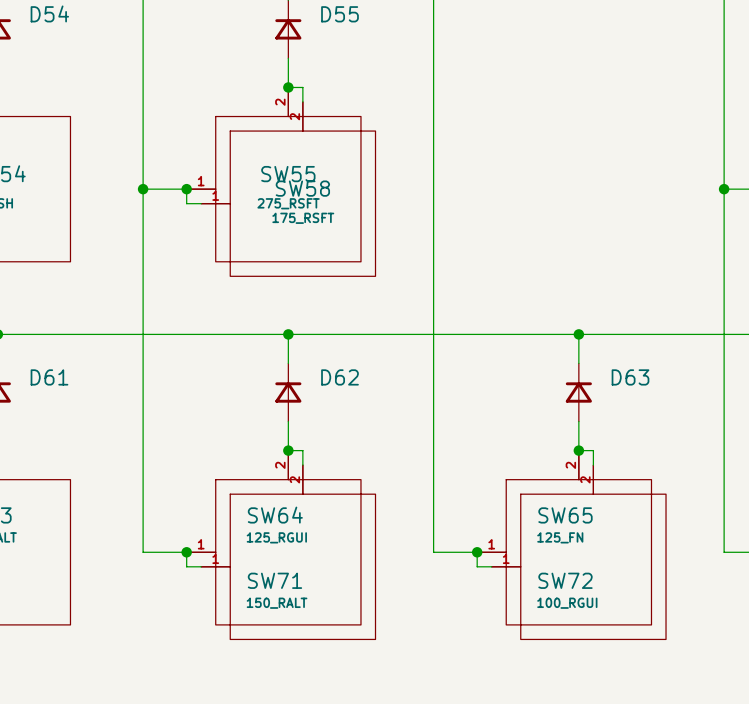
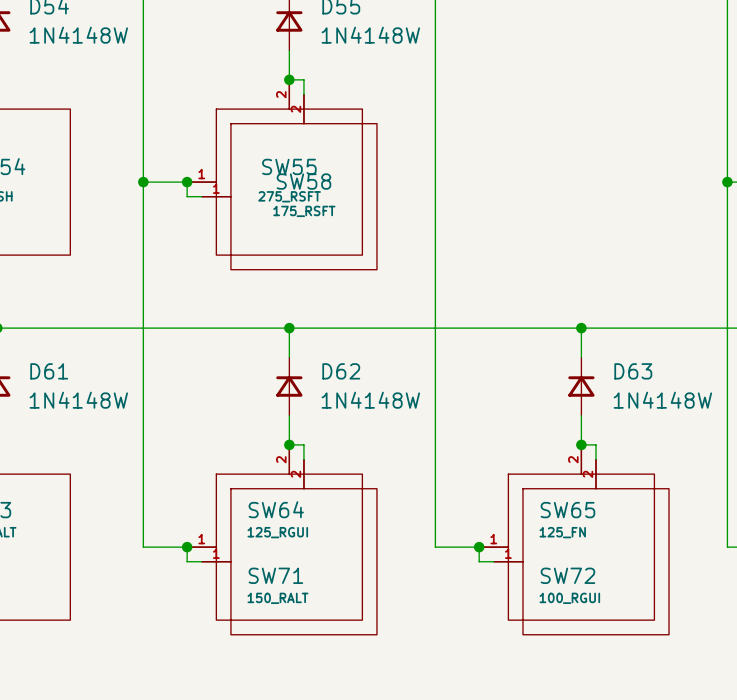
D54 value: none -> 1N4148W (78, 35)
D55 value: none -> 1N4148W (370, 35)
D61 value: none -> 1N4148W (78, 400)
D62 value: none -> 1N4148W (370, 400)
D63 value: none -> 1N4148W (662, 400)

